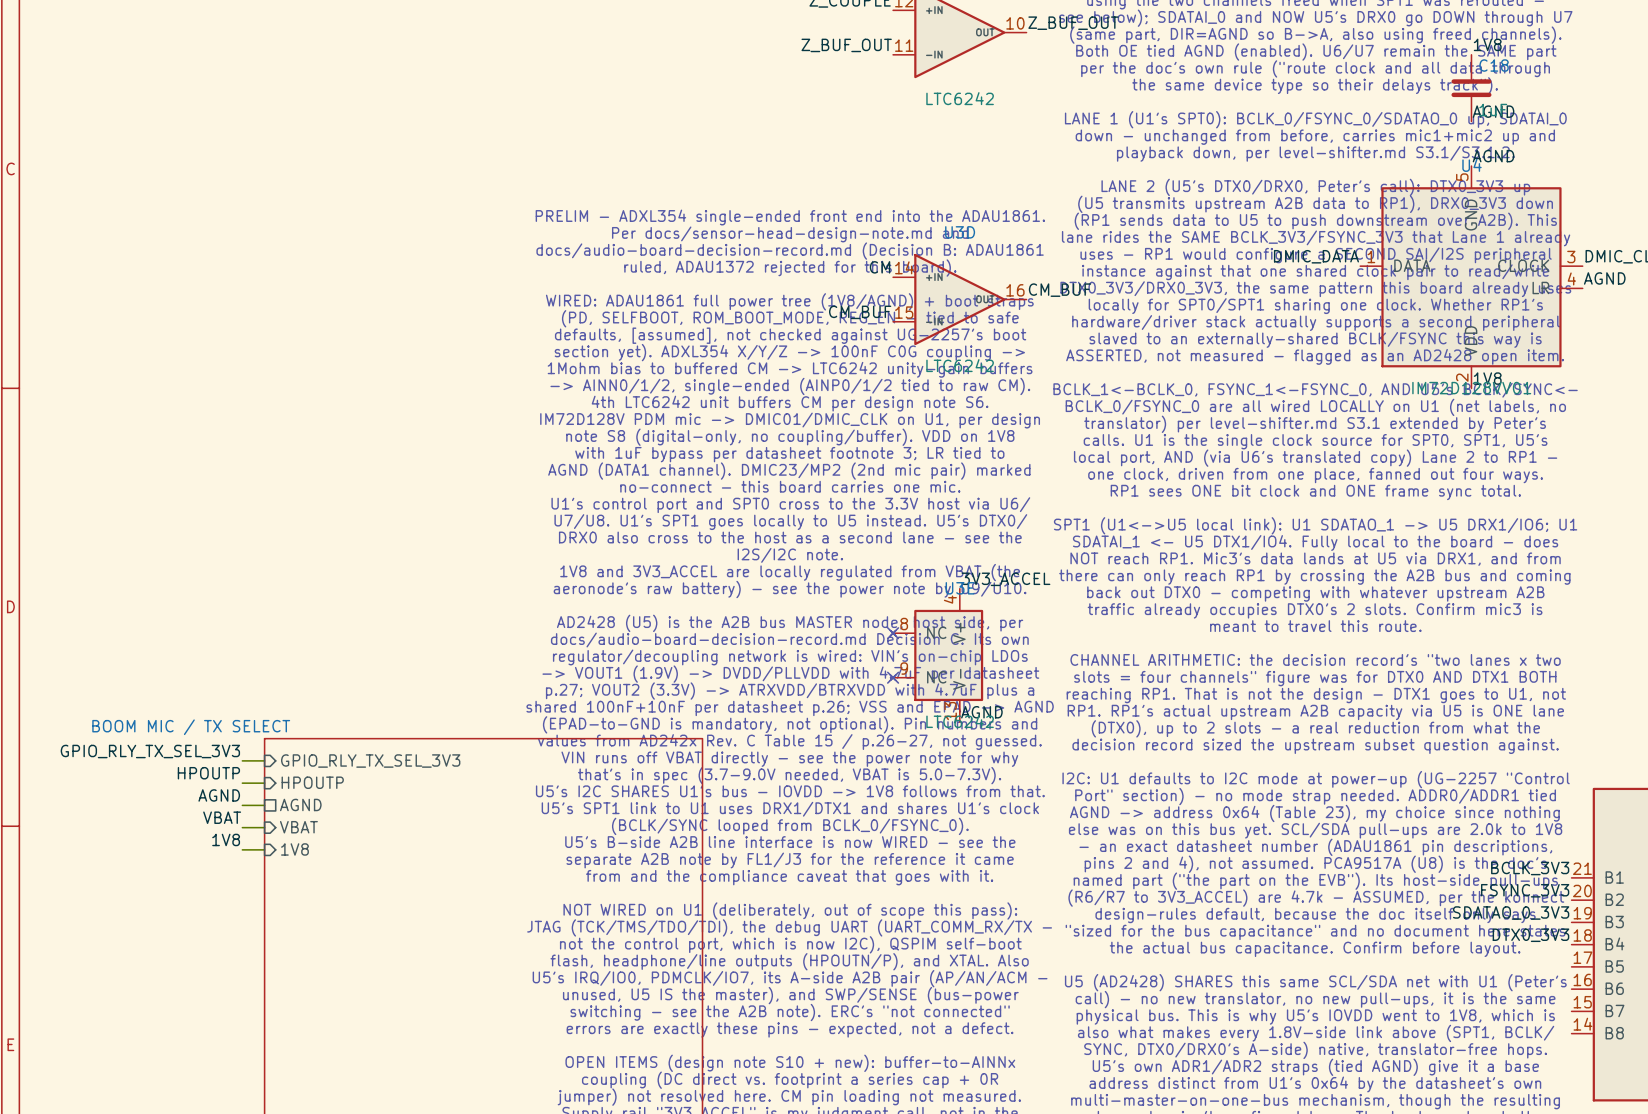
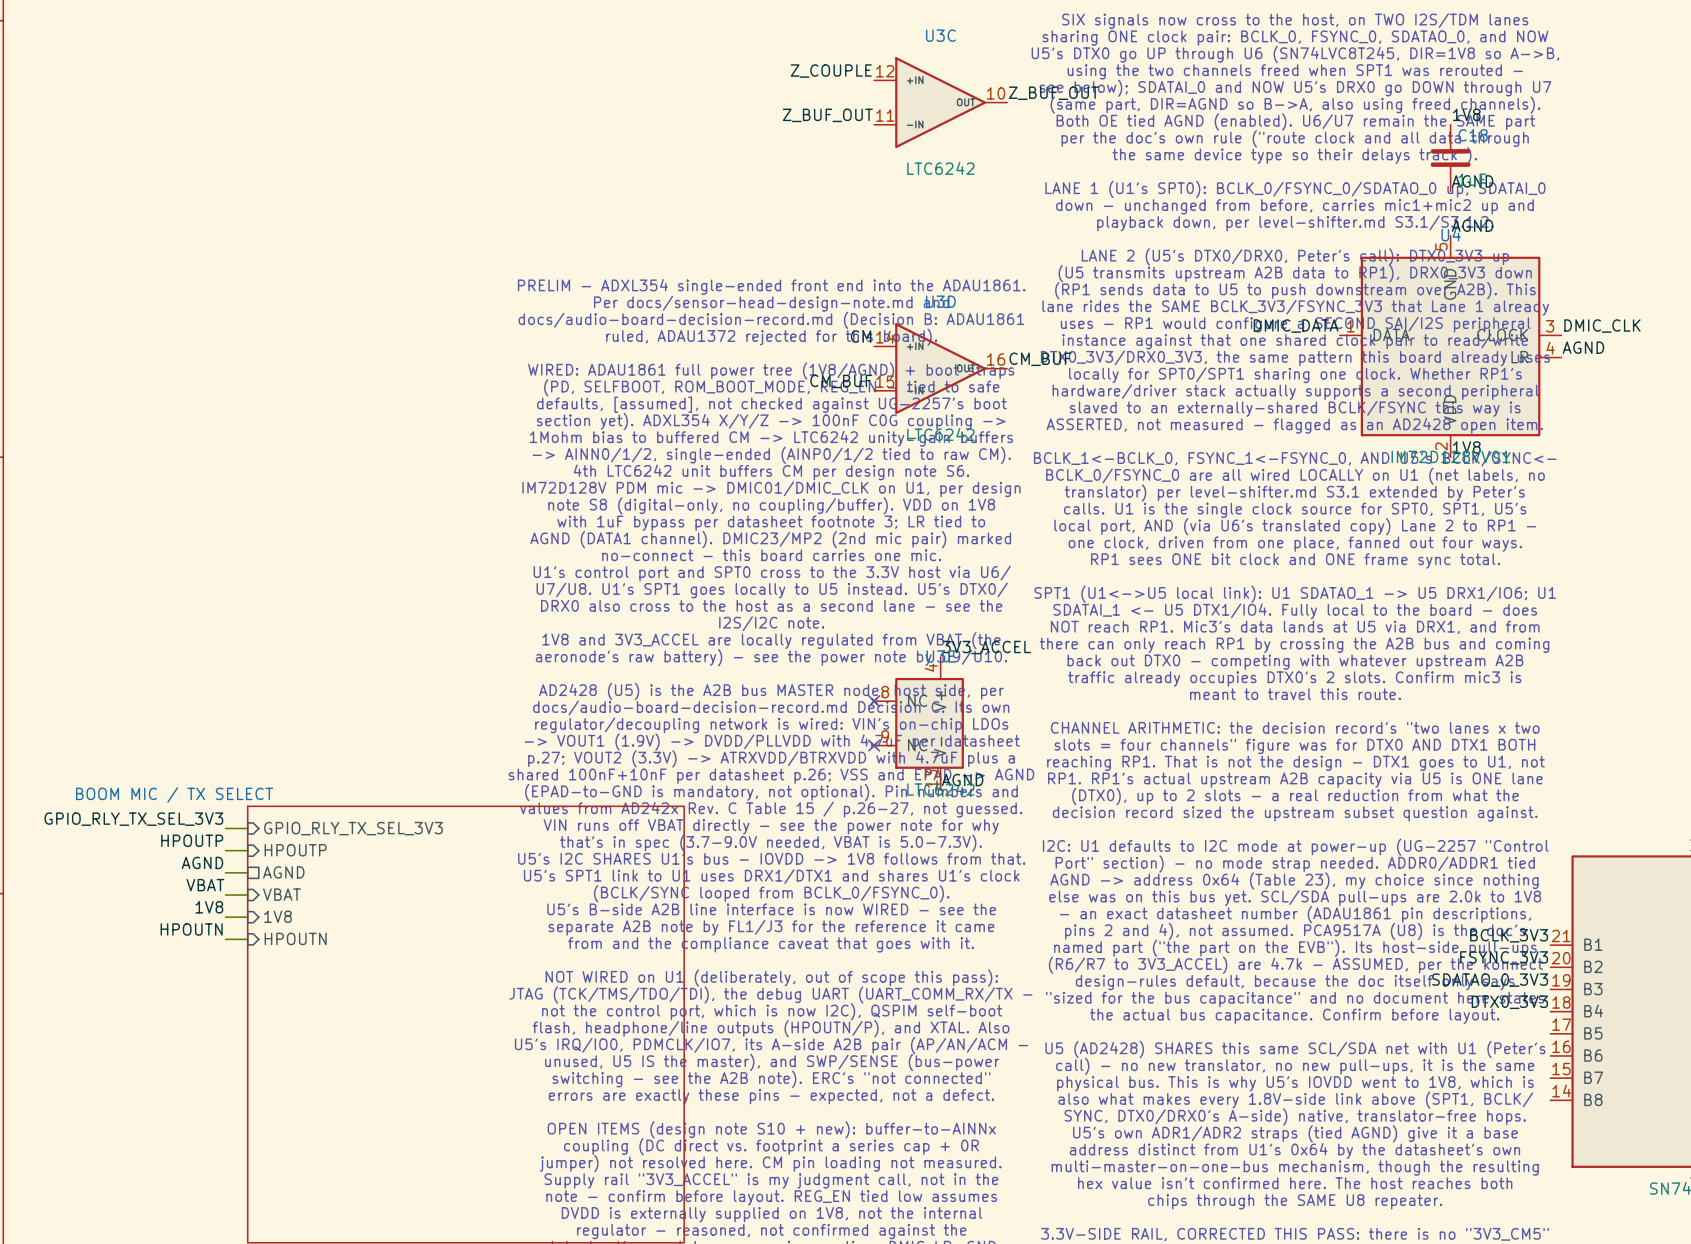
label: none -> HPOUTN (191, 929)
sheet pin: none -> HPOUTN (295, 938)
wire: none -> (225, 939) (247, 939)

